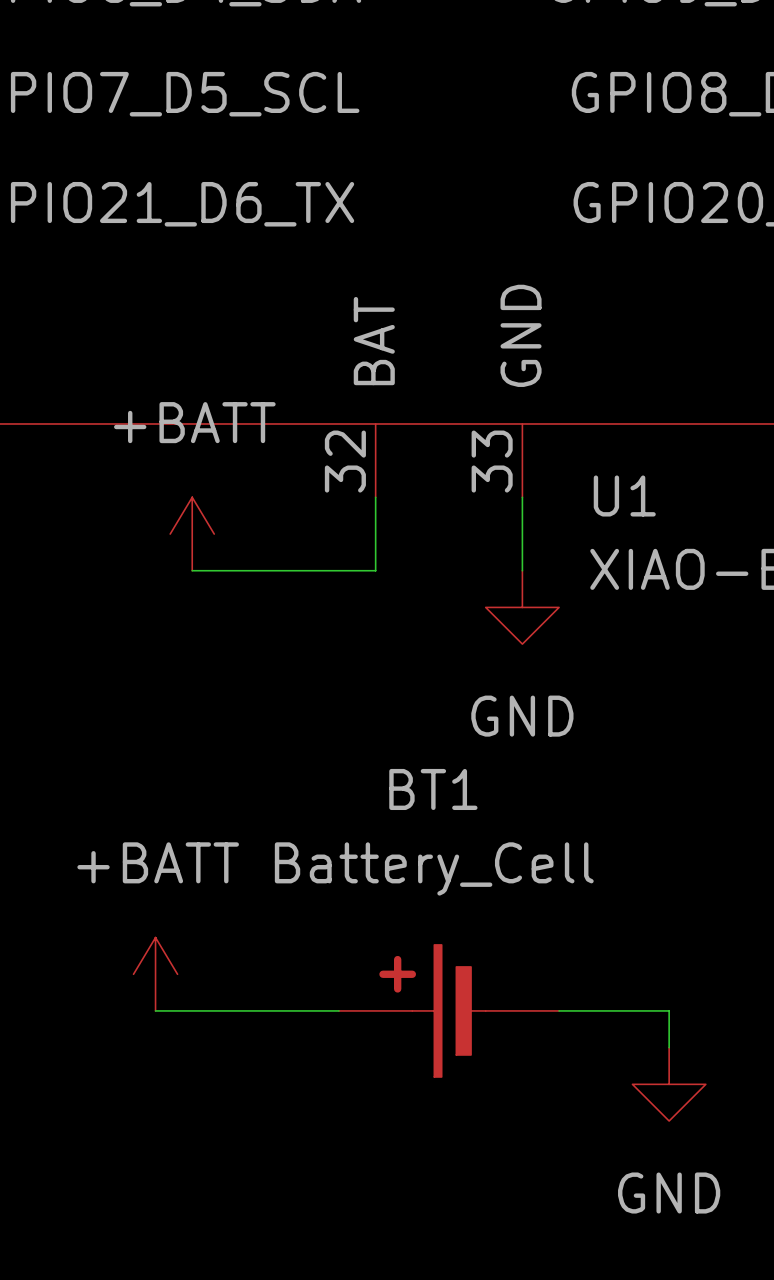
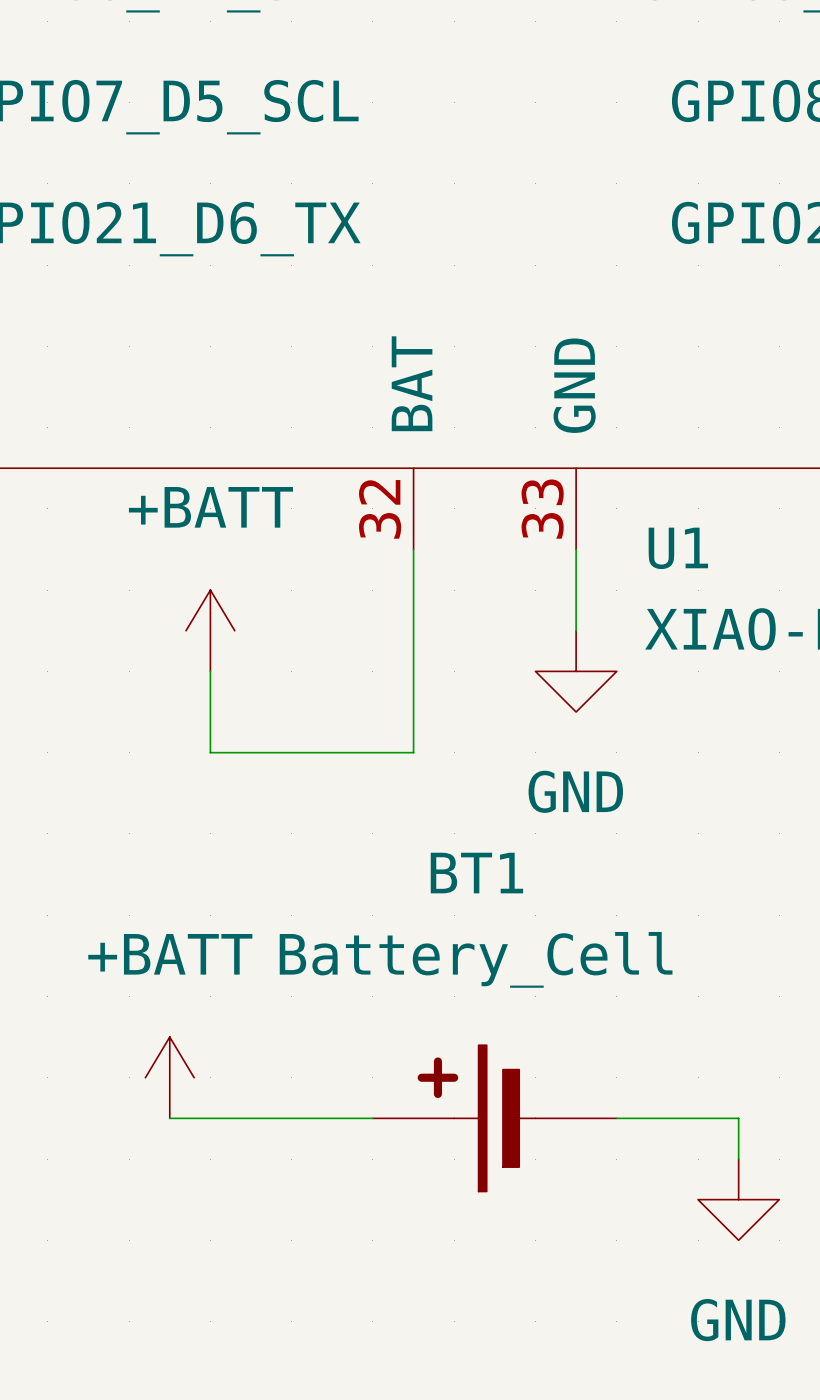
power symbol position: +BATT (192, 534) -> +BATT (210, 630)
wire: (192, 570) (375, 570) -> (210, 671) (210, 752) (413, 752) (413, 630)

